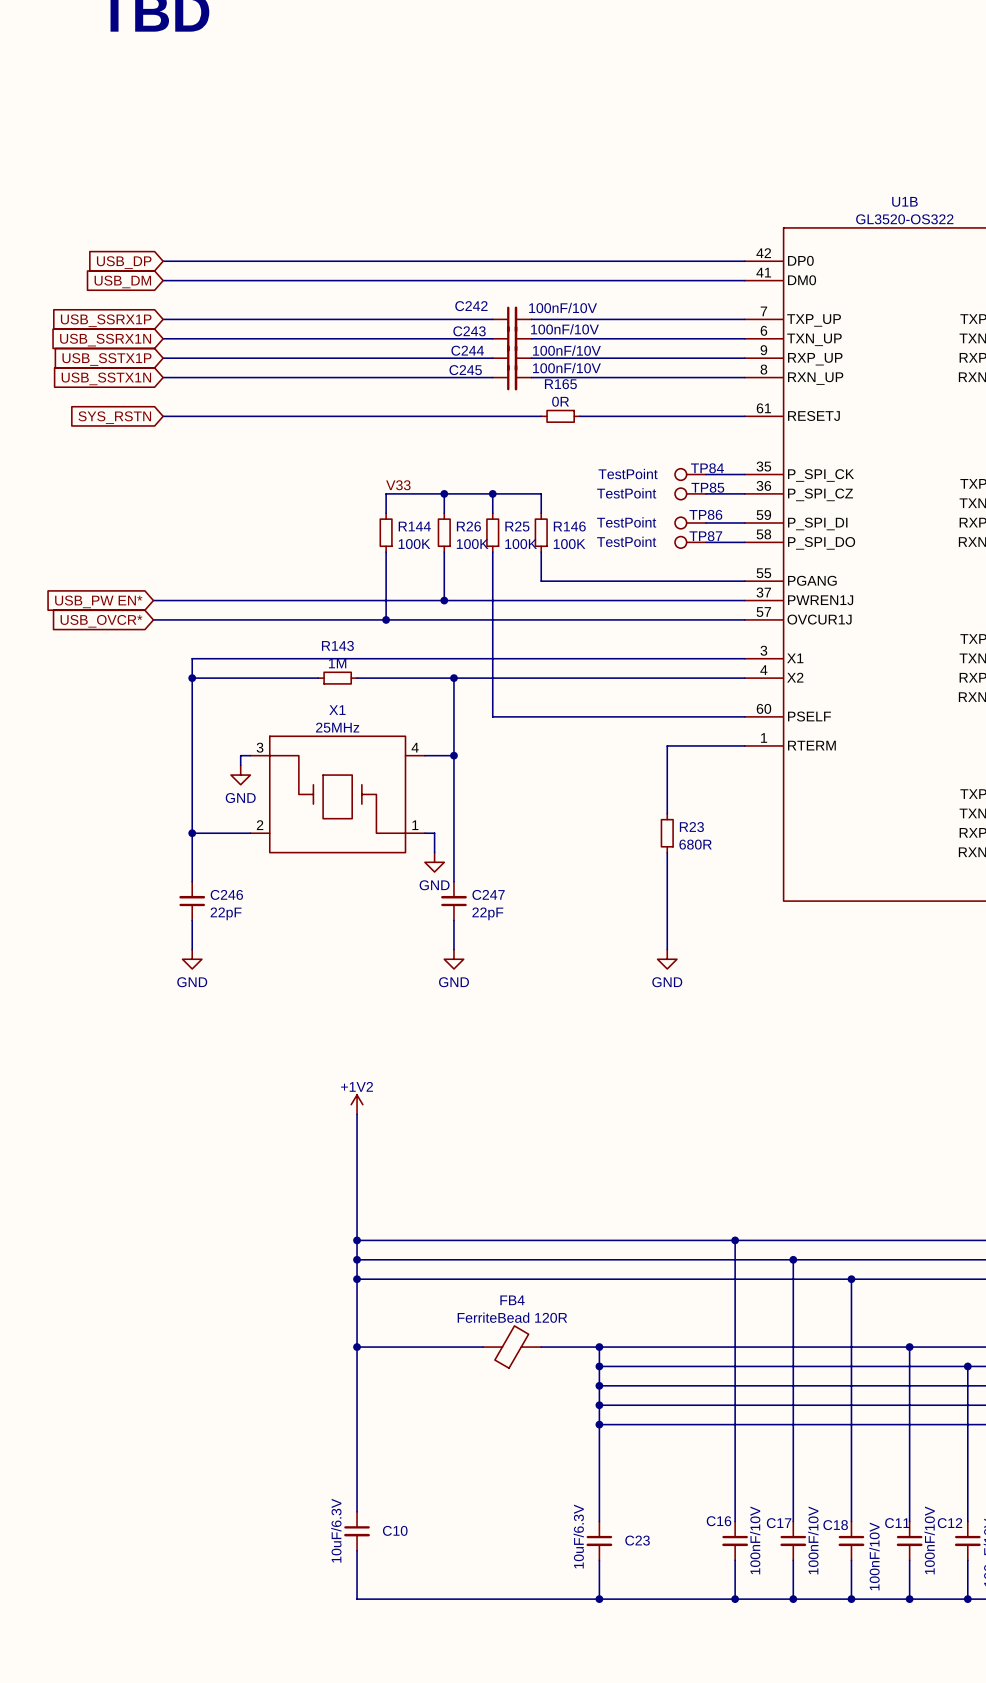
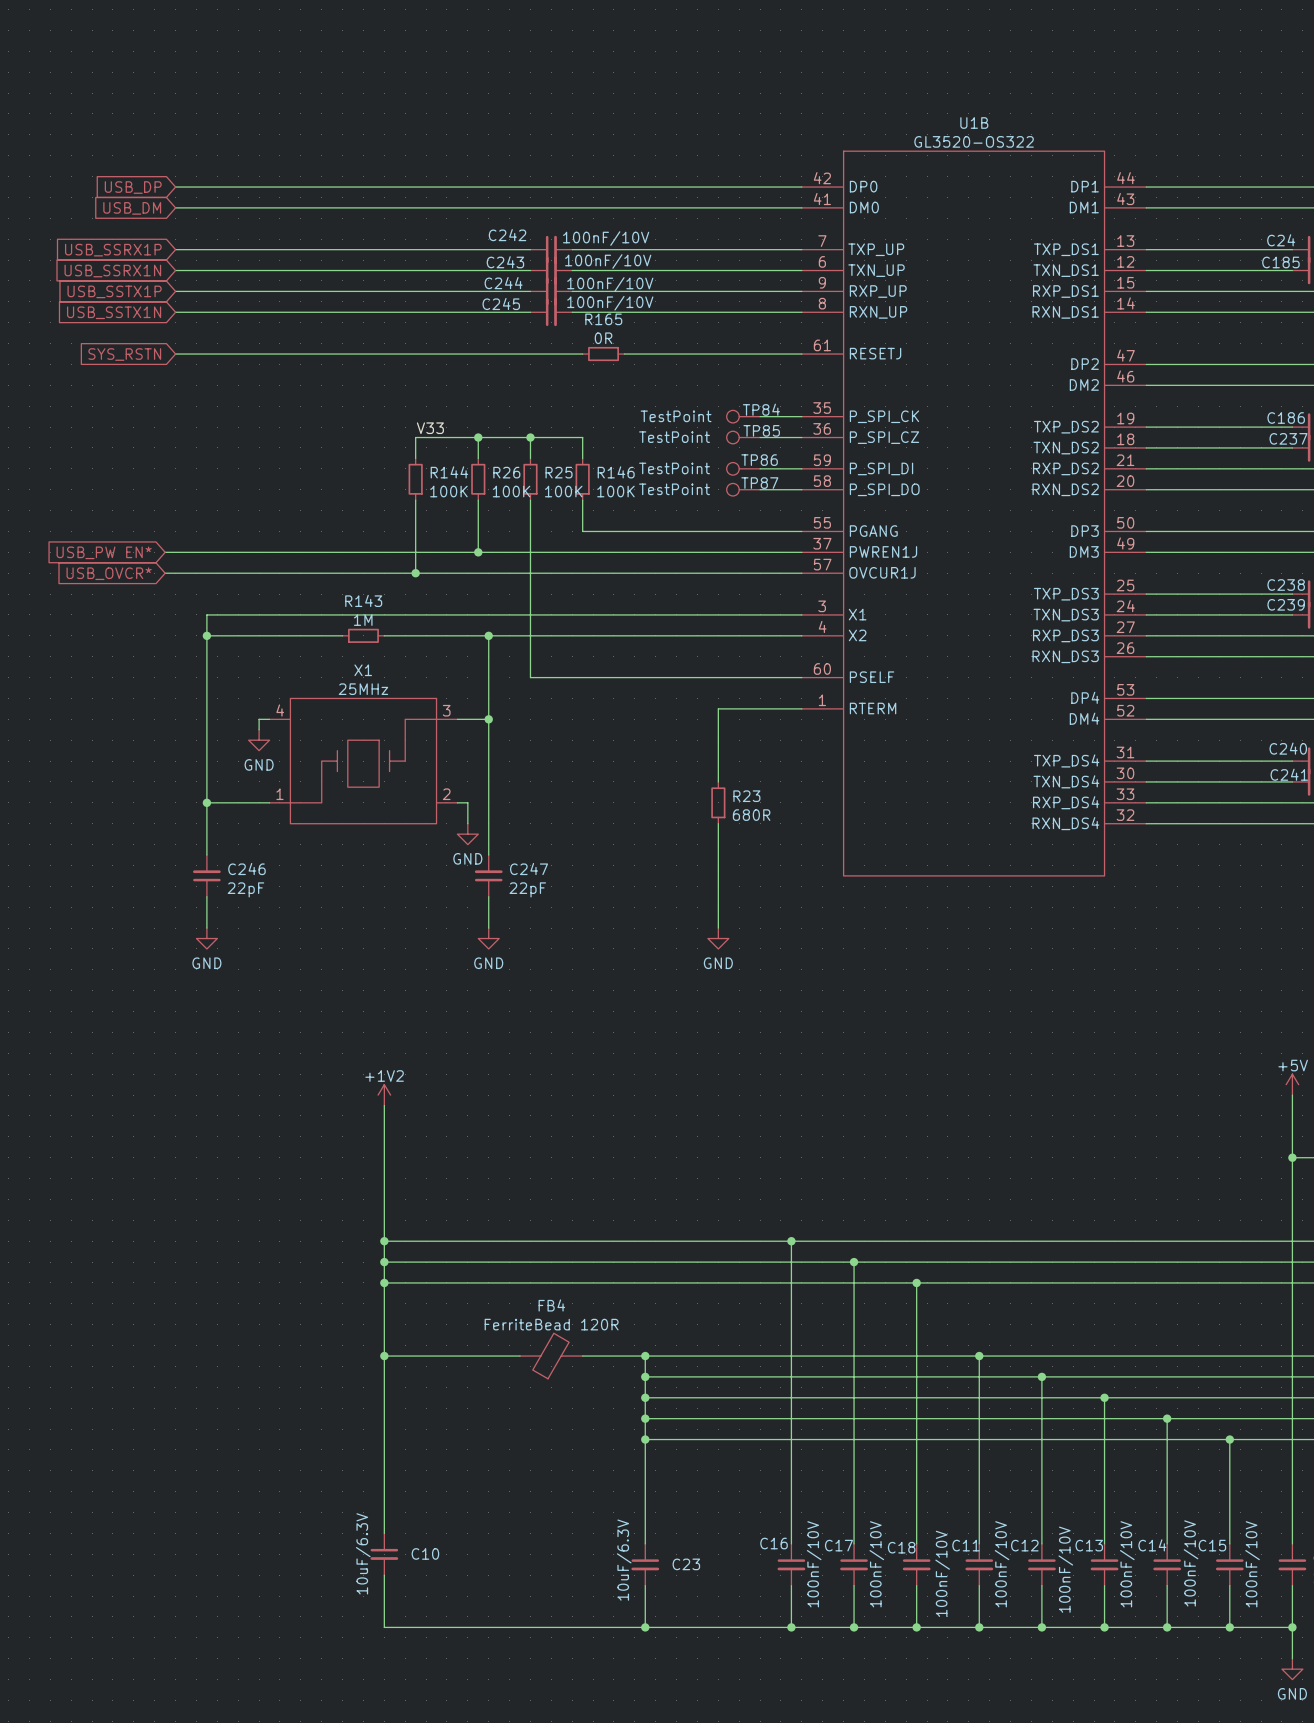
X1 flip: as is (337, 794) -> left-right (363, 761)

